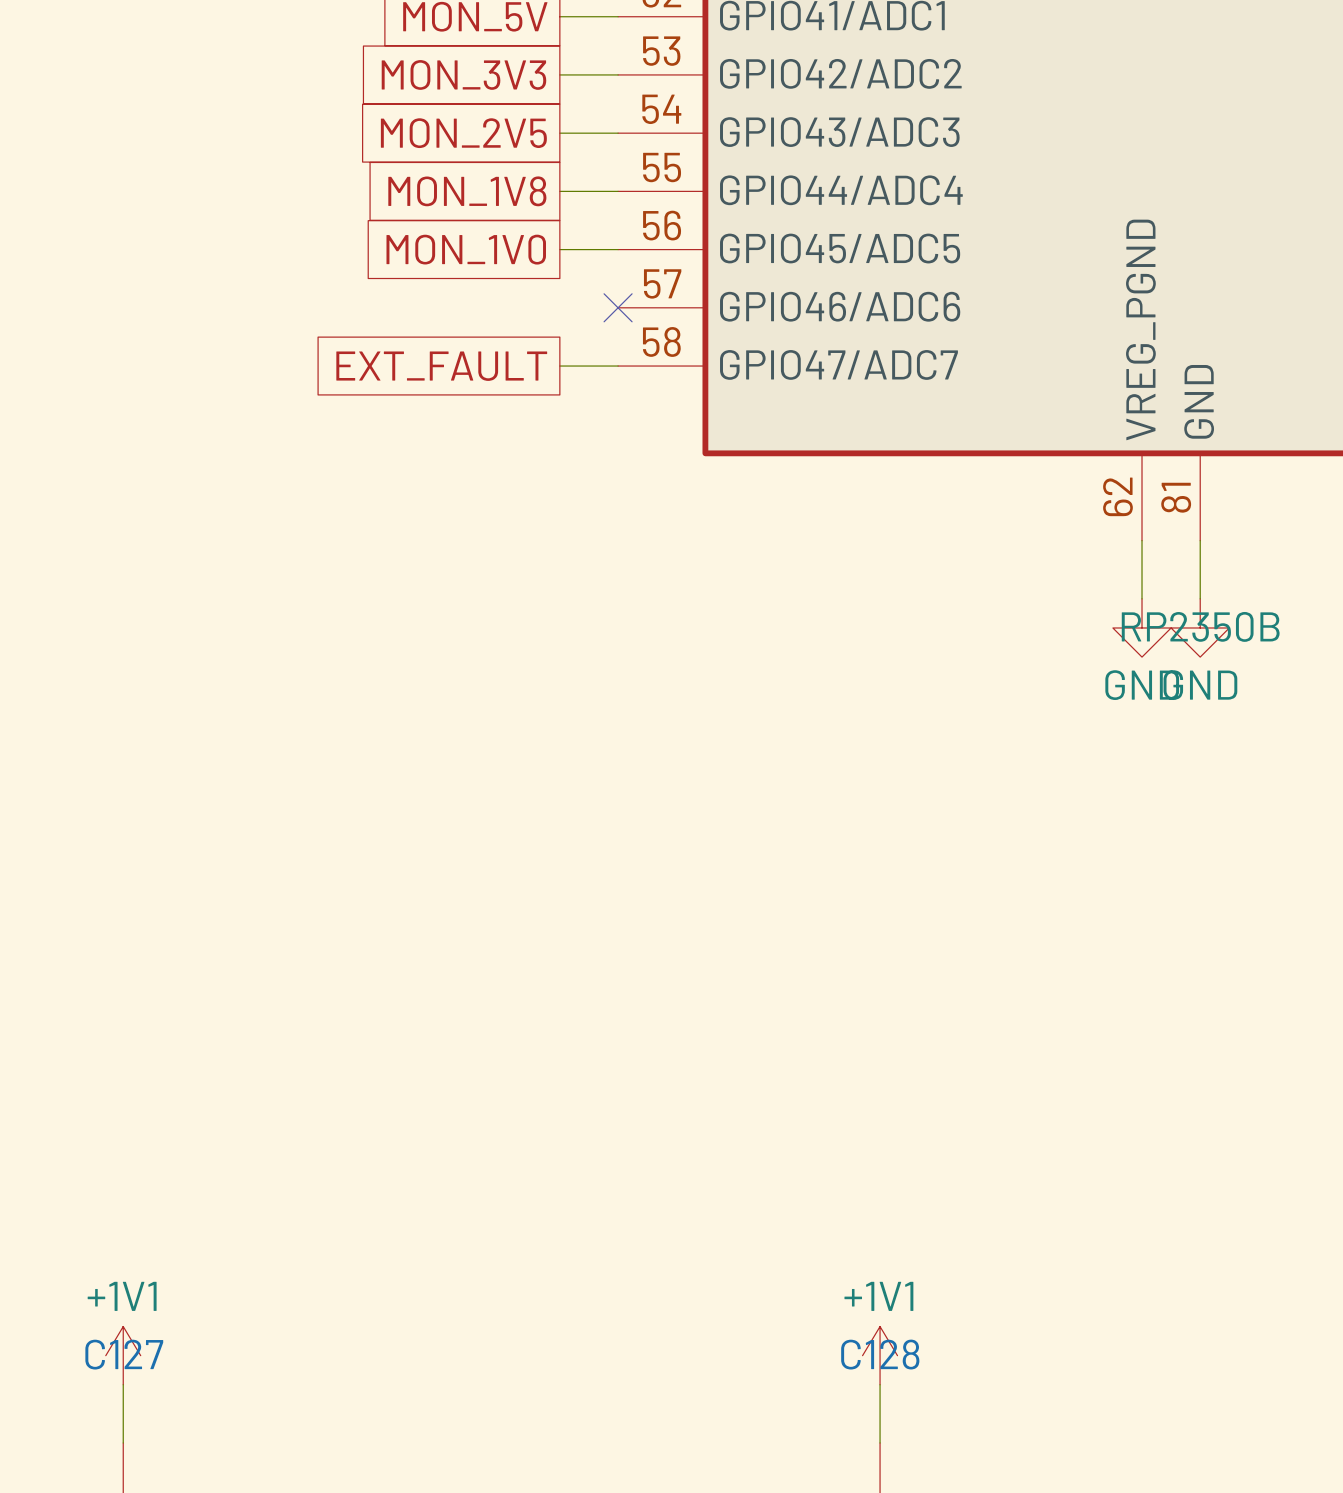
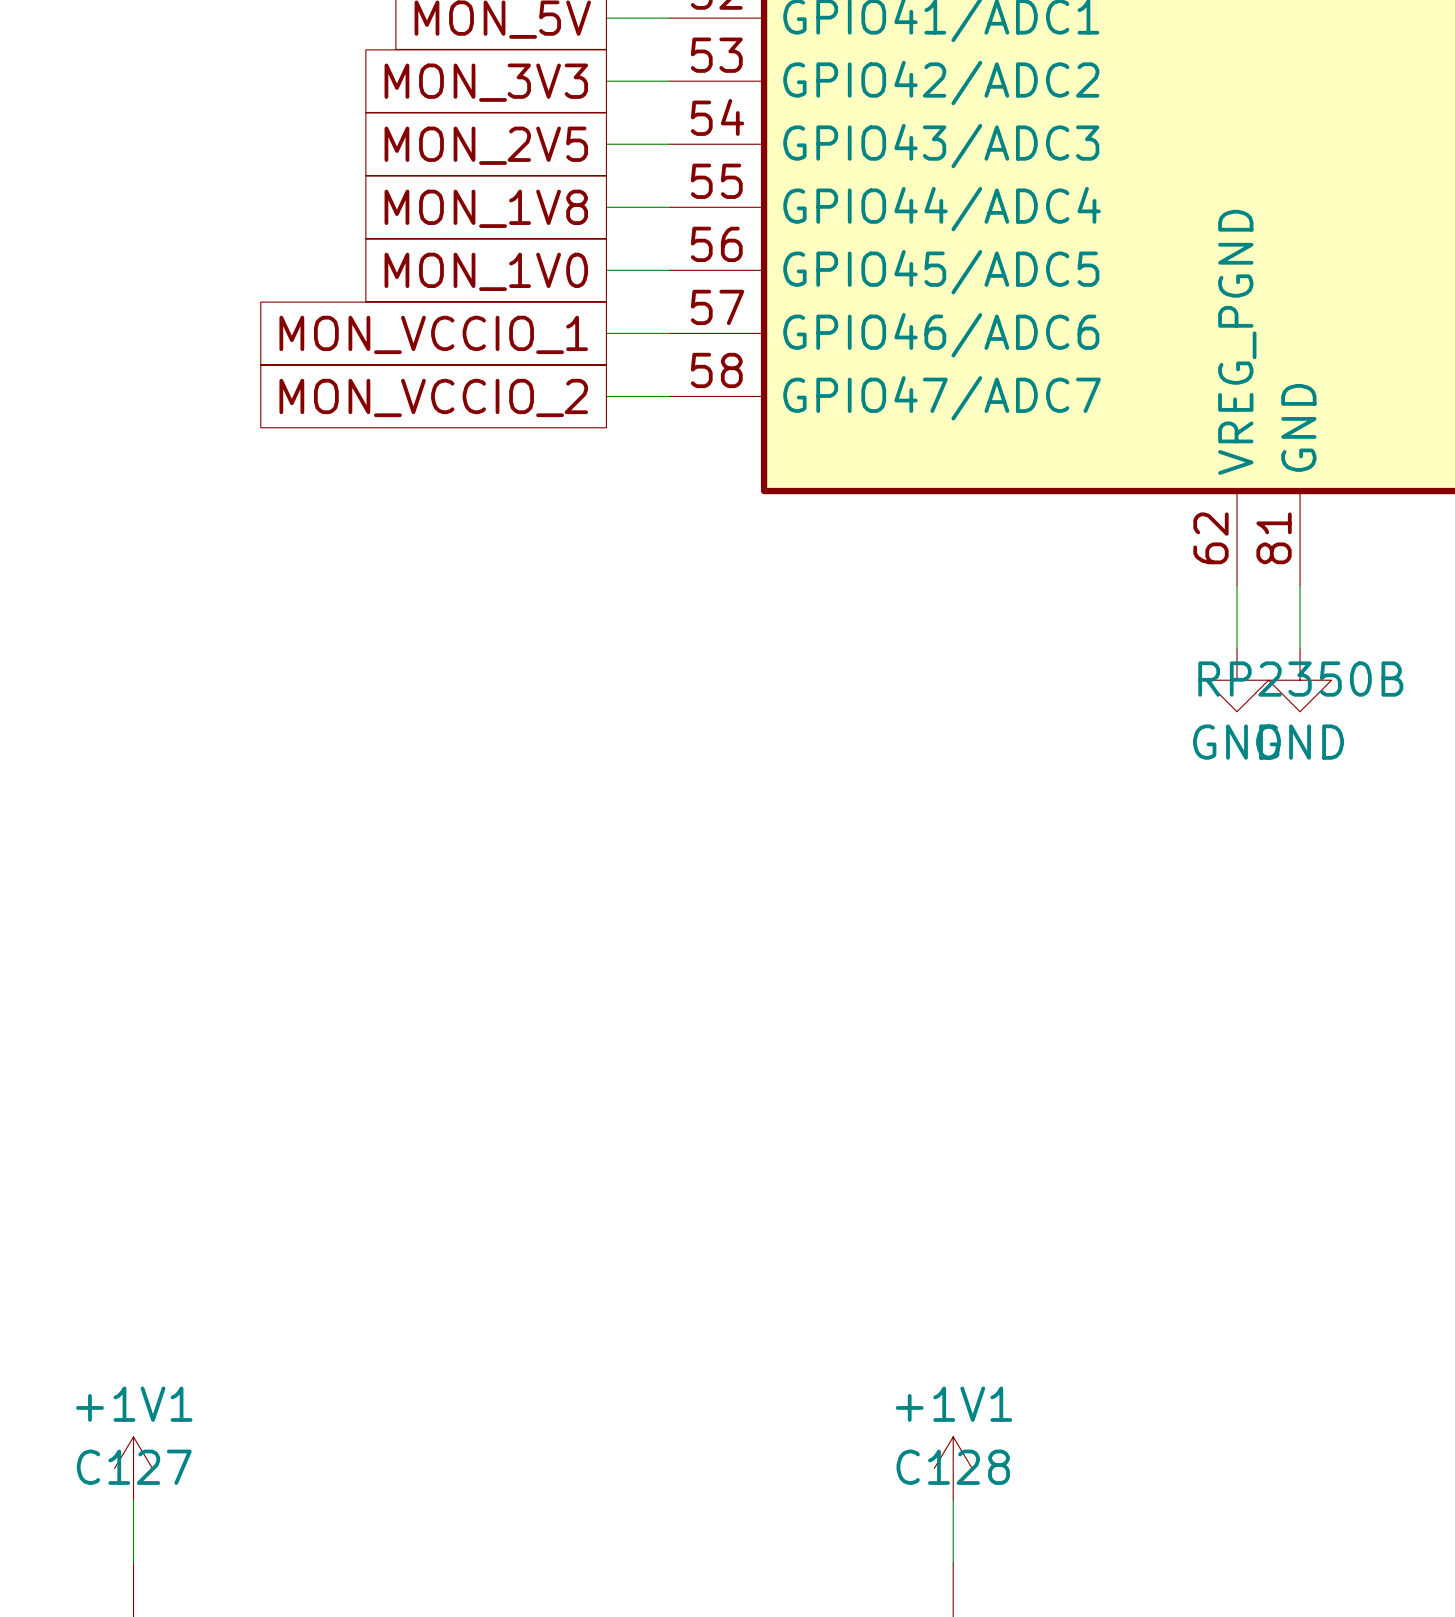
global label: none -> MON_VCCIO_1 (433, 334)
wire: none -> (606, 333) (669, 333)
no-connect mark: (618, 307) -> none
global label: EXT_FAULT (441, 366) -> MON_VCCIO_2 (433, 397)

